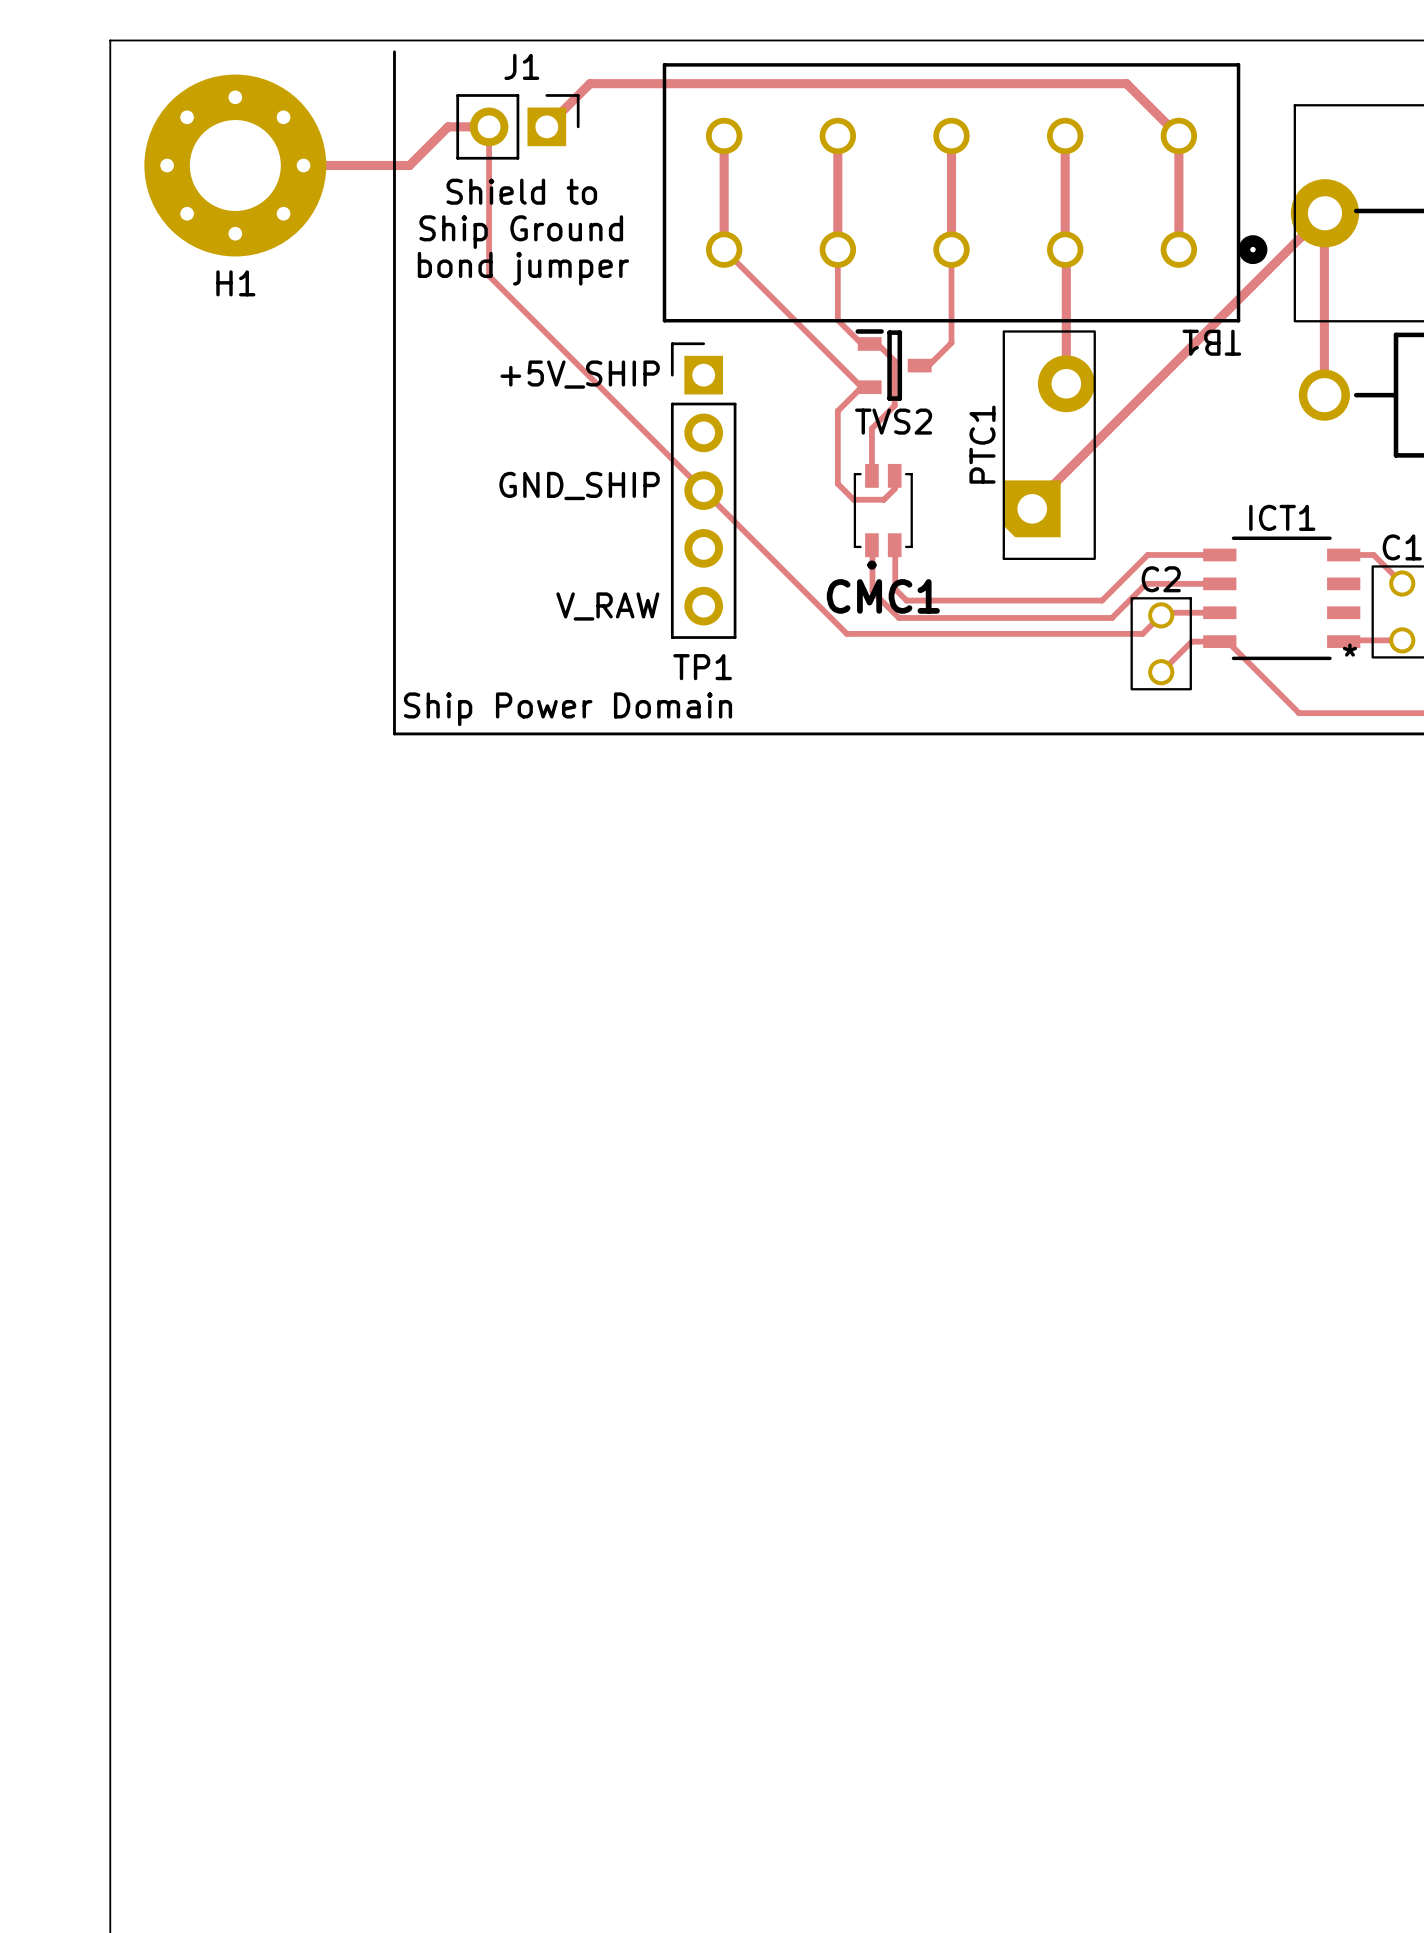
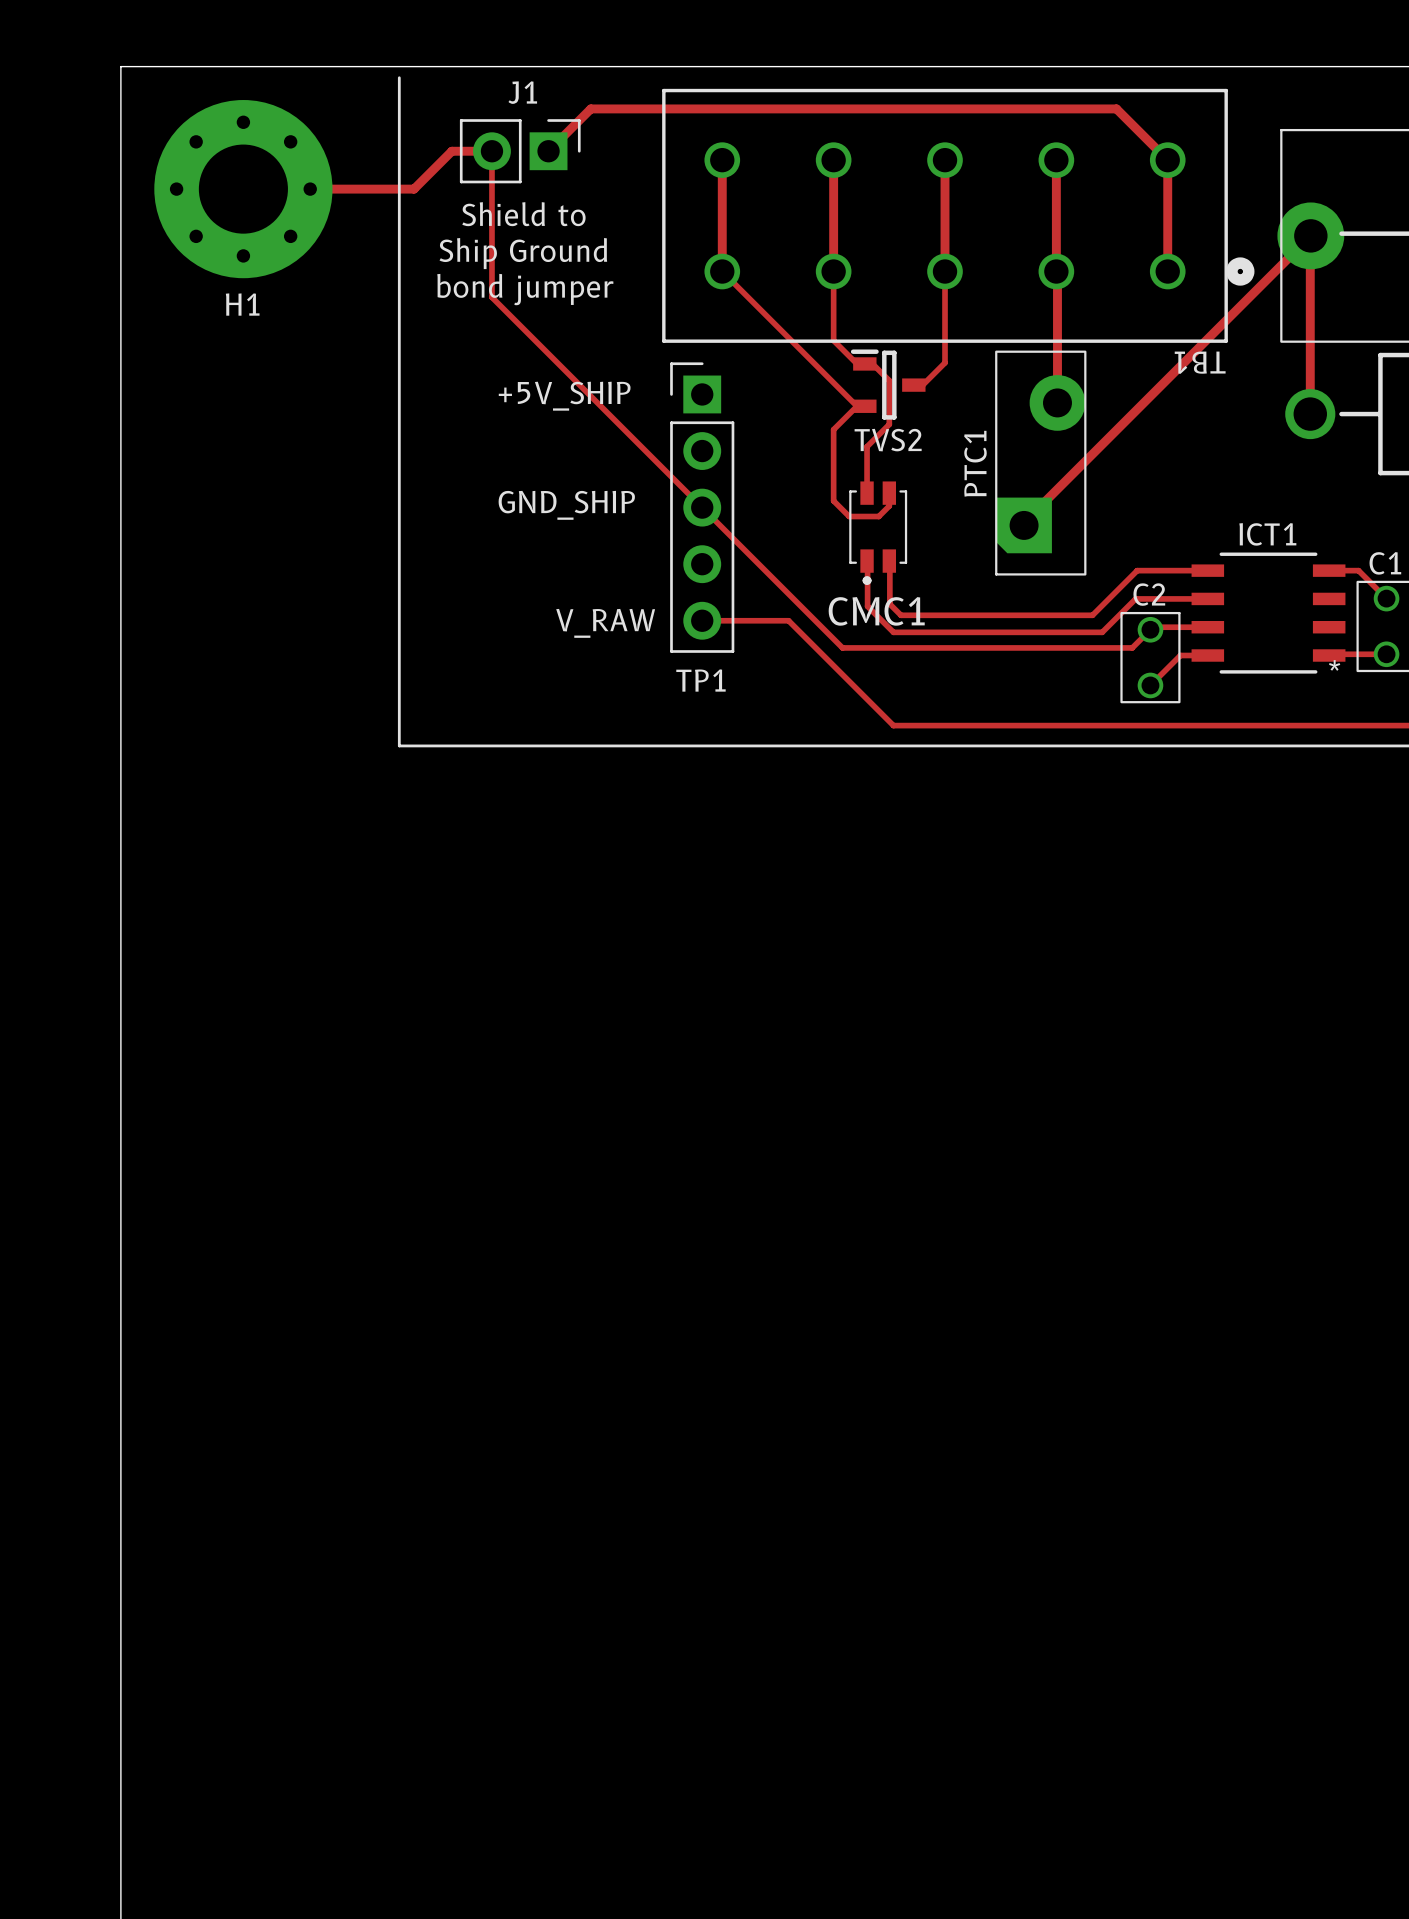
track: (1219, 641) (1227, 641) (1299, 713) -> (702, 620) (788, 620) (893, 725) (1285, 725)
text: Ship Power Domain (568, 709) -> none

